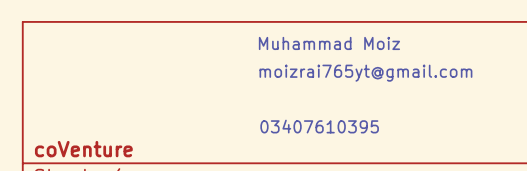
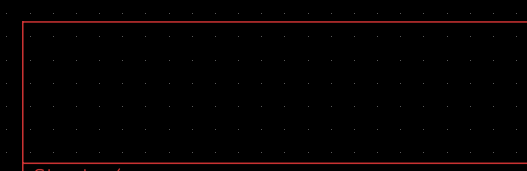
text: Muhammad Moiz (329, 43) -> none
text: moizrai765yt@gmail.com (365, 73) -> none
text: 03407610395 (319, 126) -> none
title block: coVenture (83, 149) -> none

